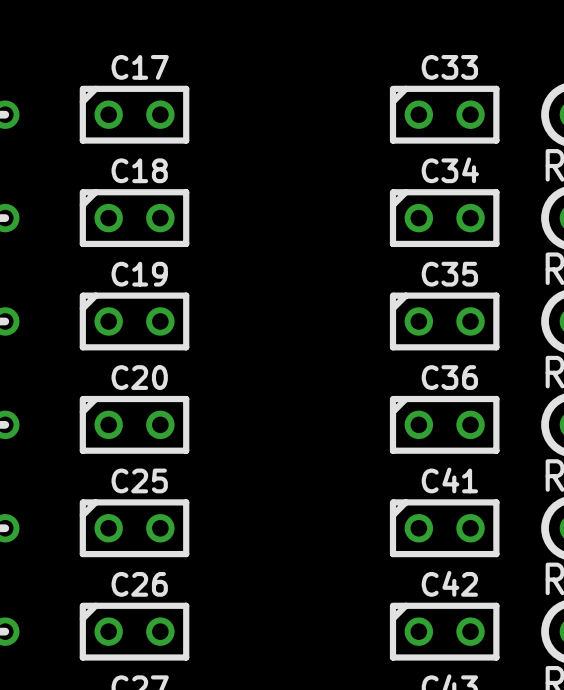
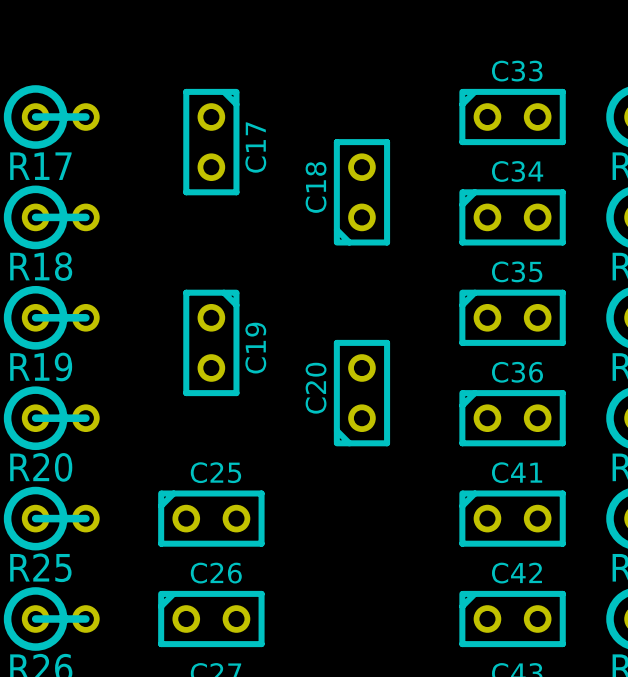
C17 rotation: 0° (134, 114) -> 90° clockwise (211, 142)
C18 rotation: 0° (134, 218) -> 90° counterclockwise (361, 192)
C18 position: (134, 218) -> (361, 192)
C19 rotation: 0° (134, 321) -> 90° clockwise (211, 342)
C20 rotation: 0° (134, 424) -> 90° counterclockwise (361, 393)
C20 position: (134, 424) -> (361, 393)

